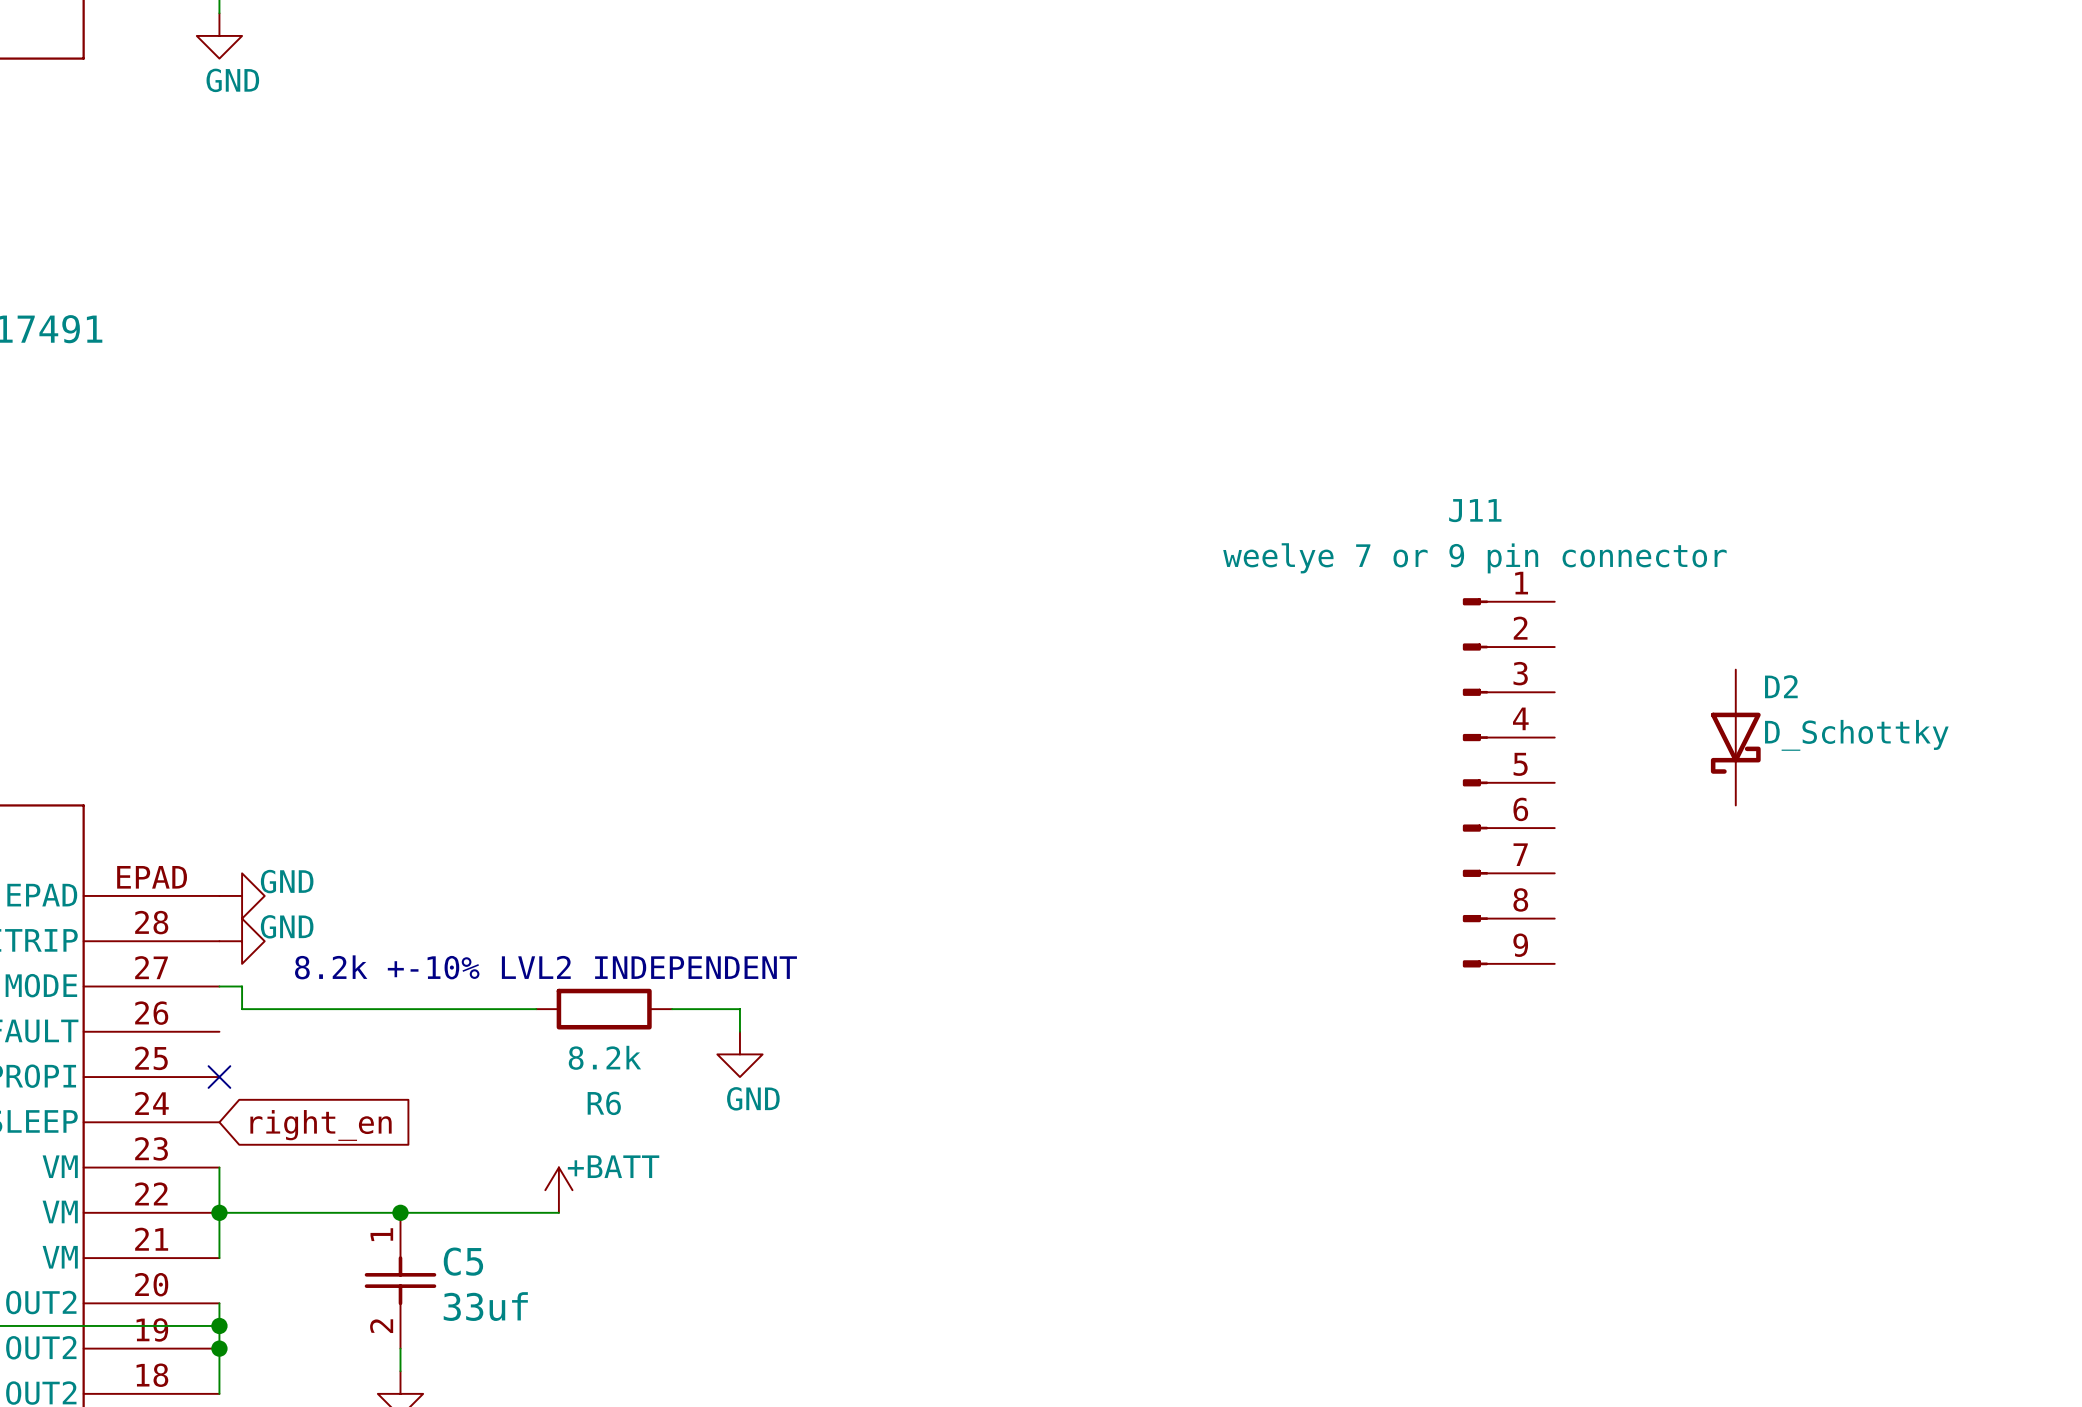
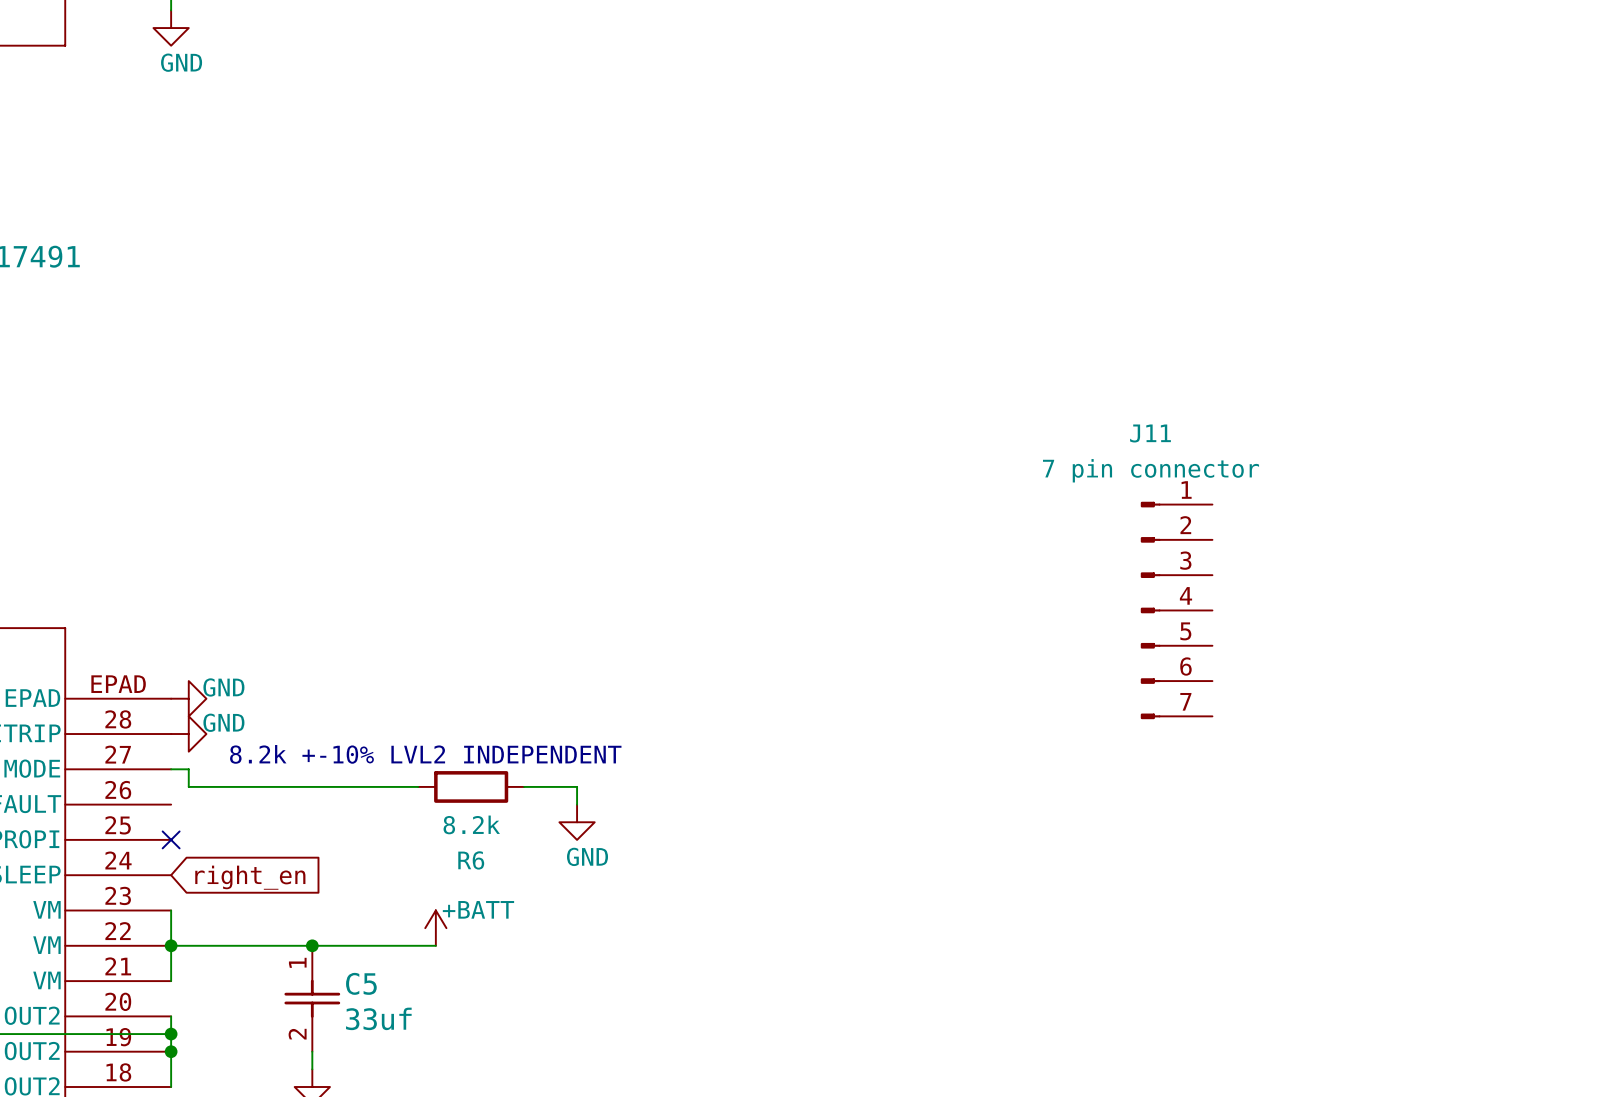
J11 name position: J11 (1475, 510) -> J11 (1150, 433)
J11 value: weelye 7 or 9 pin connector (1474, 558) -> 7 pin connector (1151, 470)
J11 symbol: [1462, 598, 1555, 968] -> [1140, 501, 1213, 720]
D2: D_Schottky (1735, 737) -> none

